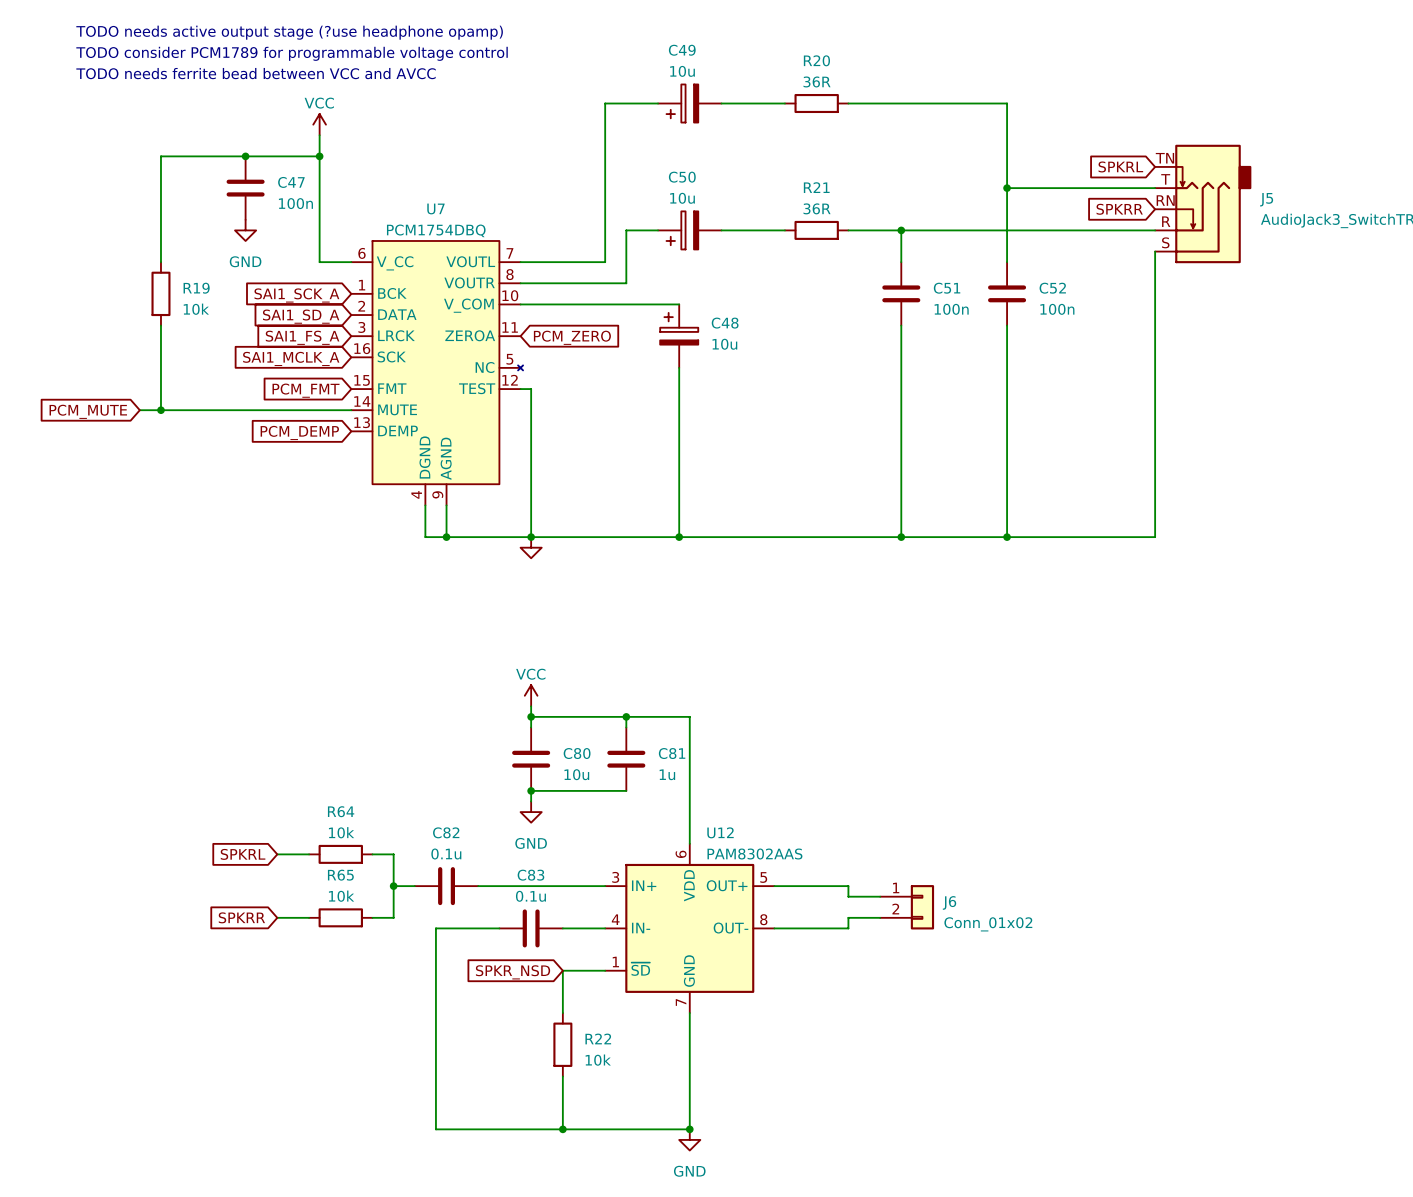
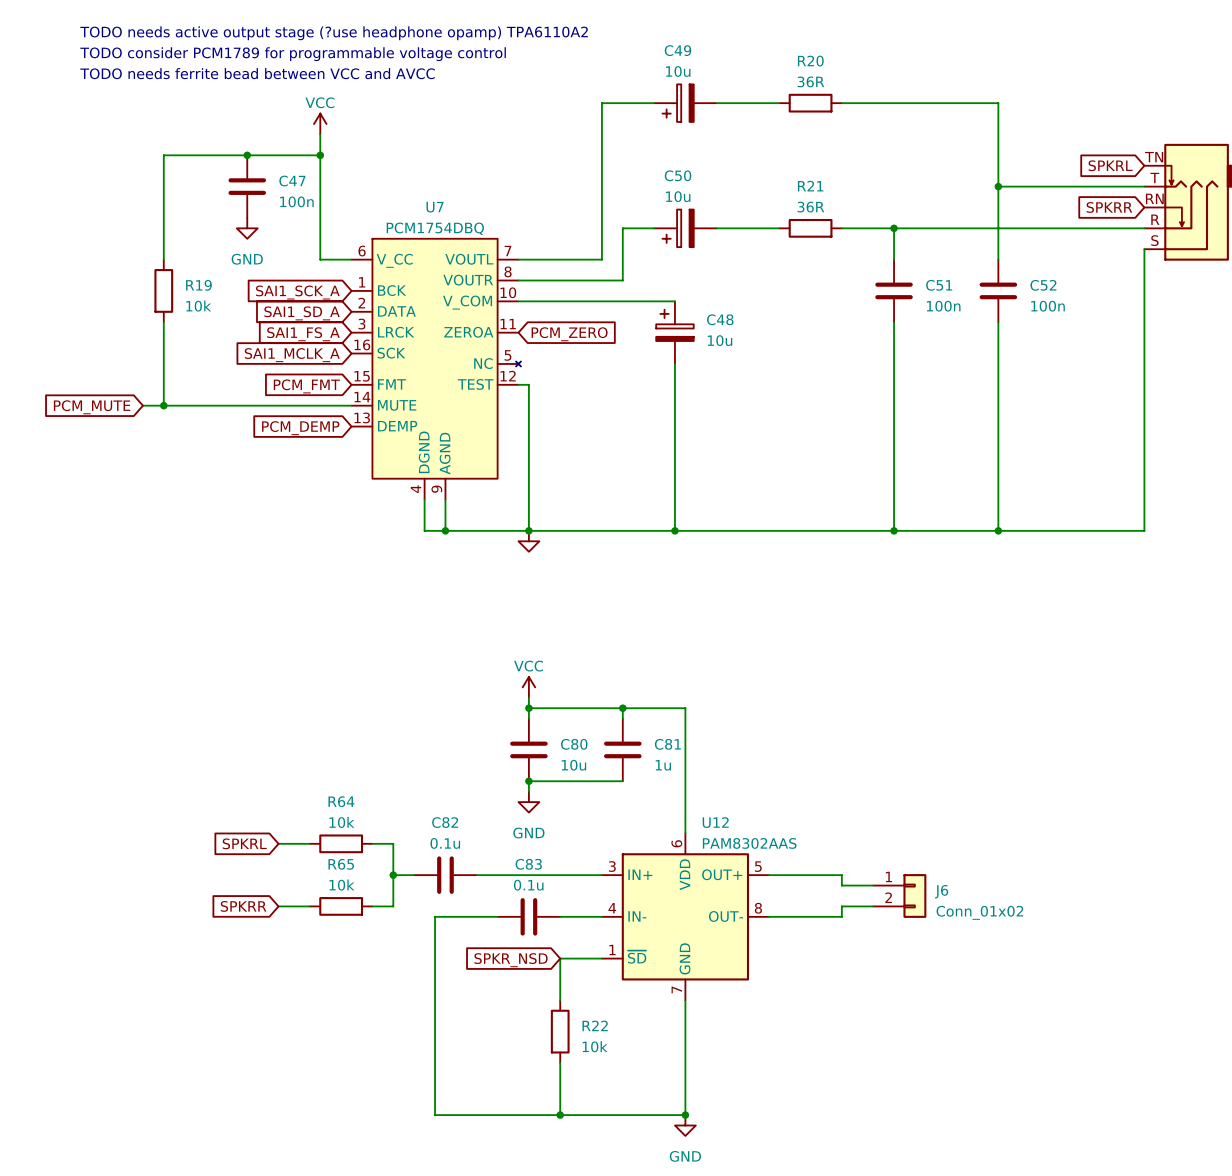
text: TODO needs active output stage (?use headphone opamp) (289, 32) -> TODO needs active output stage (?use headphone opamp) TPA6110A2 (334, 33)

